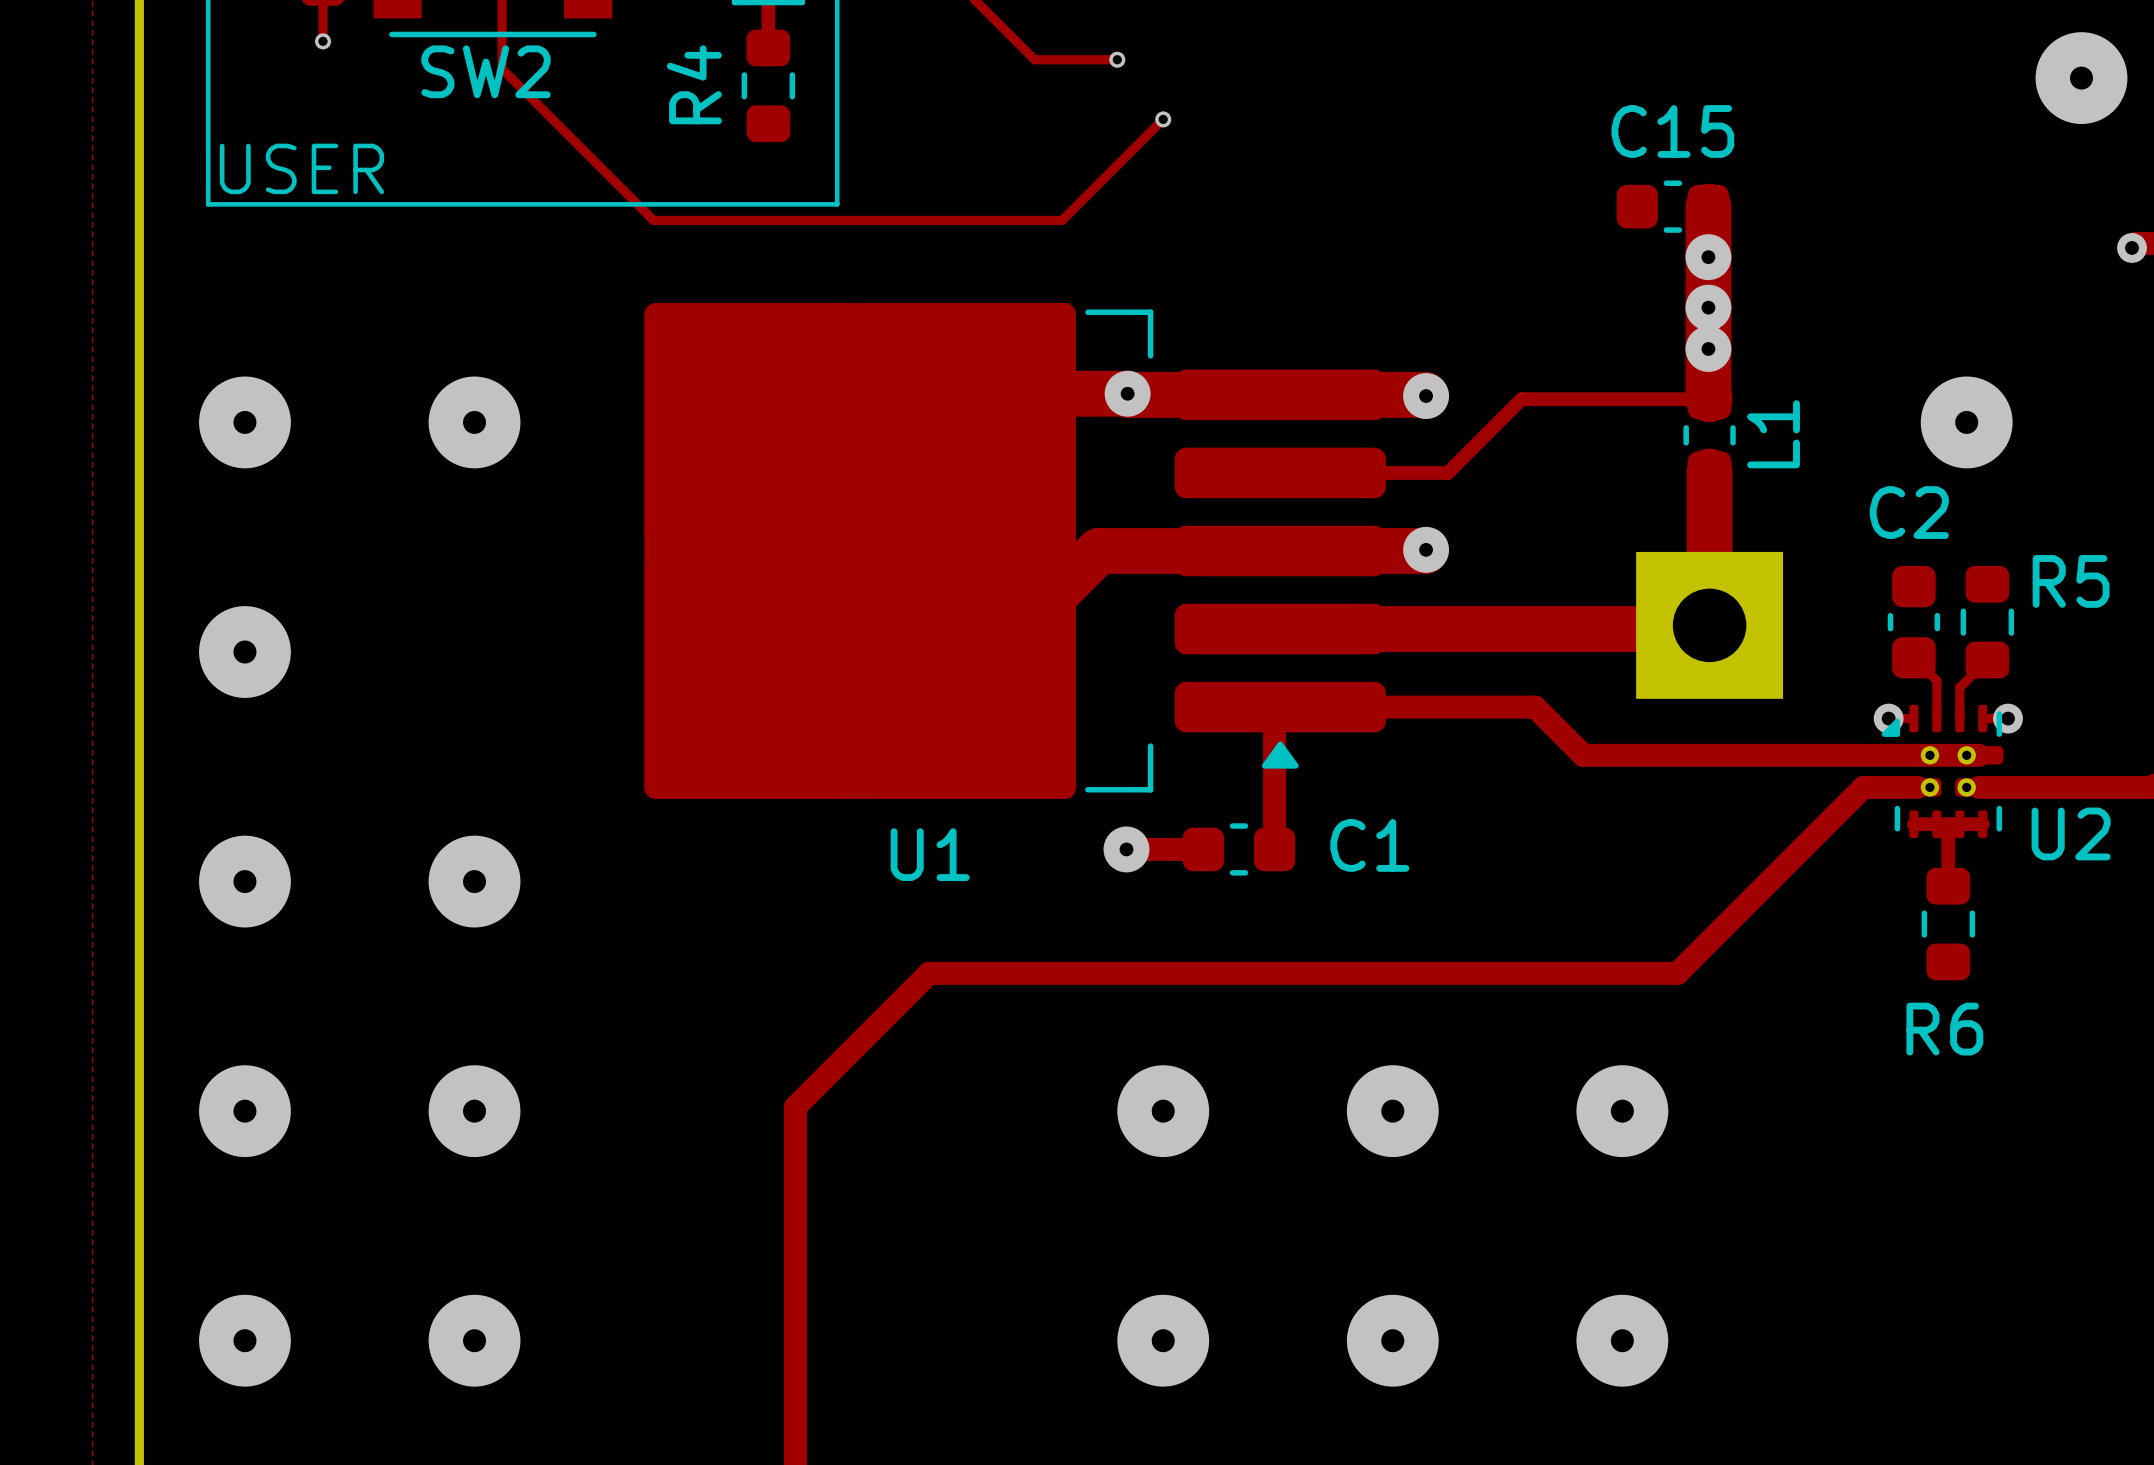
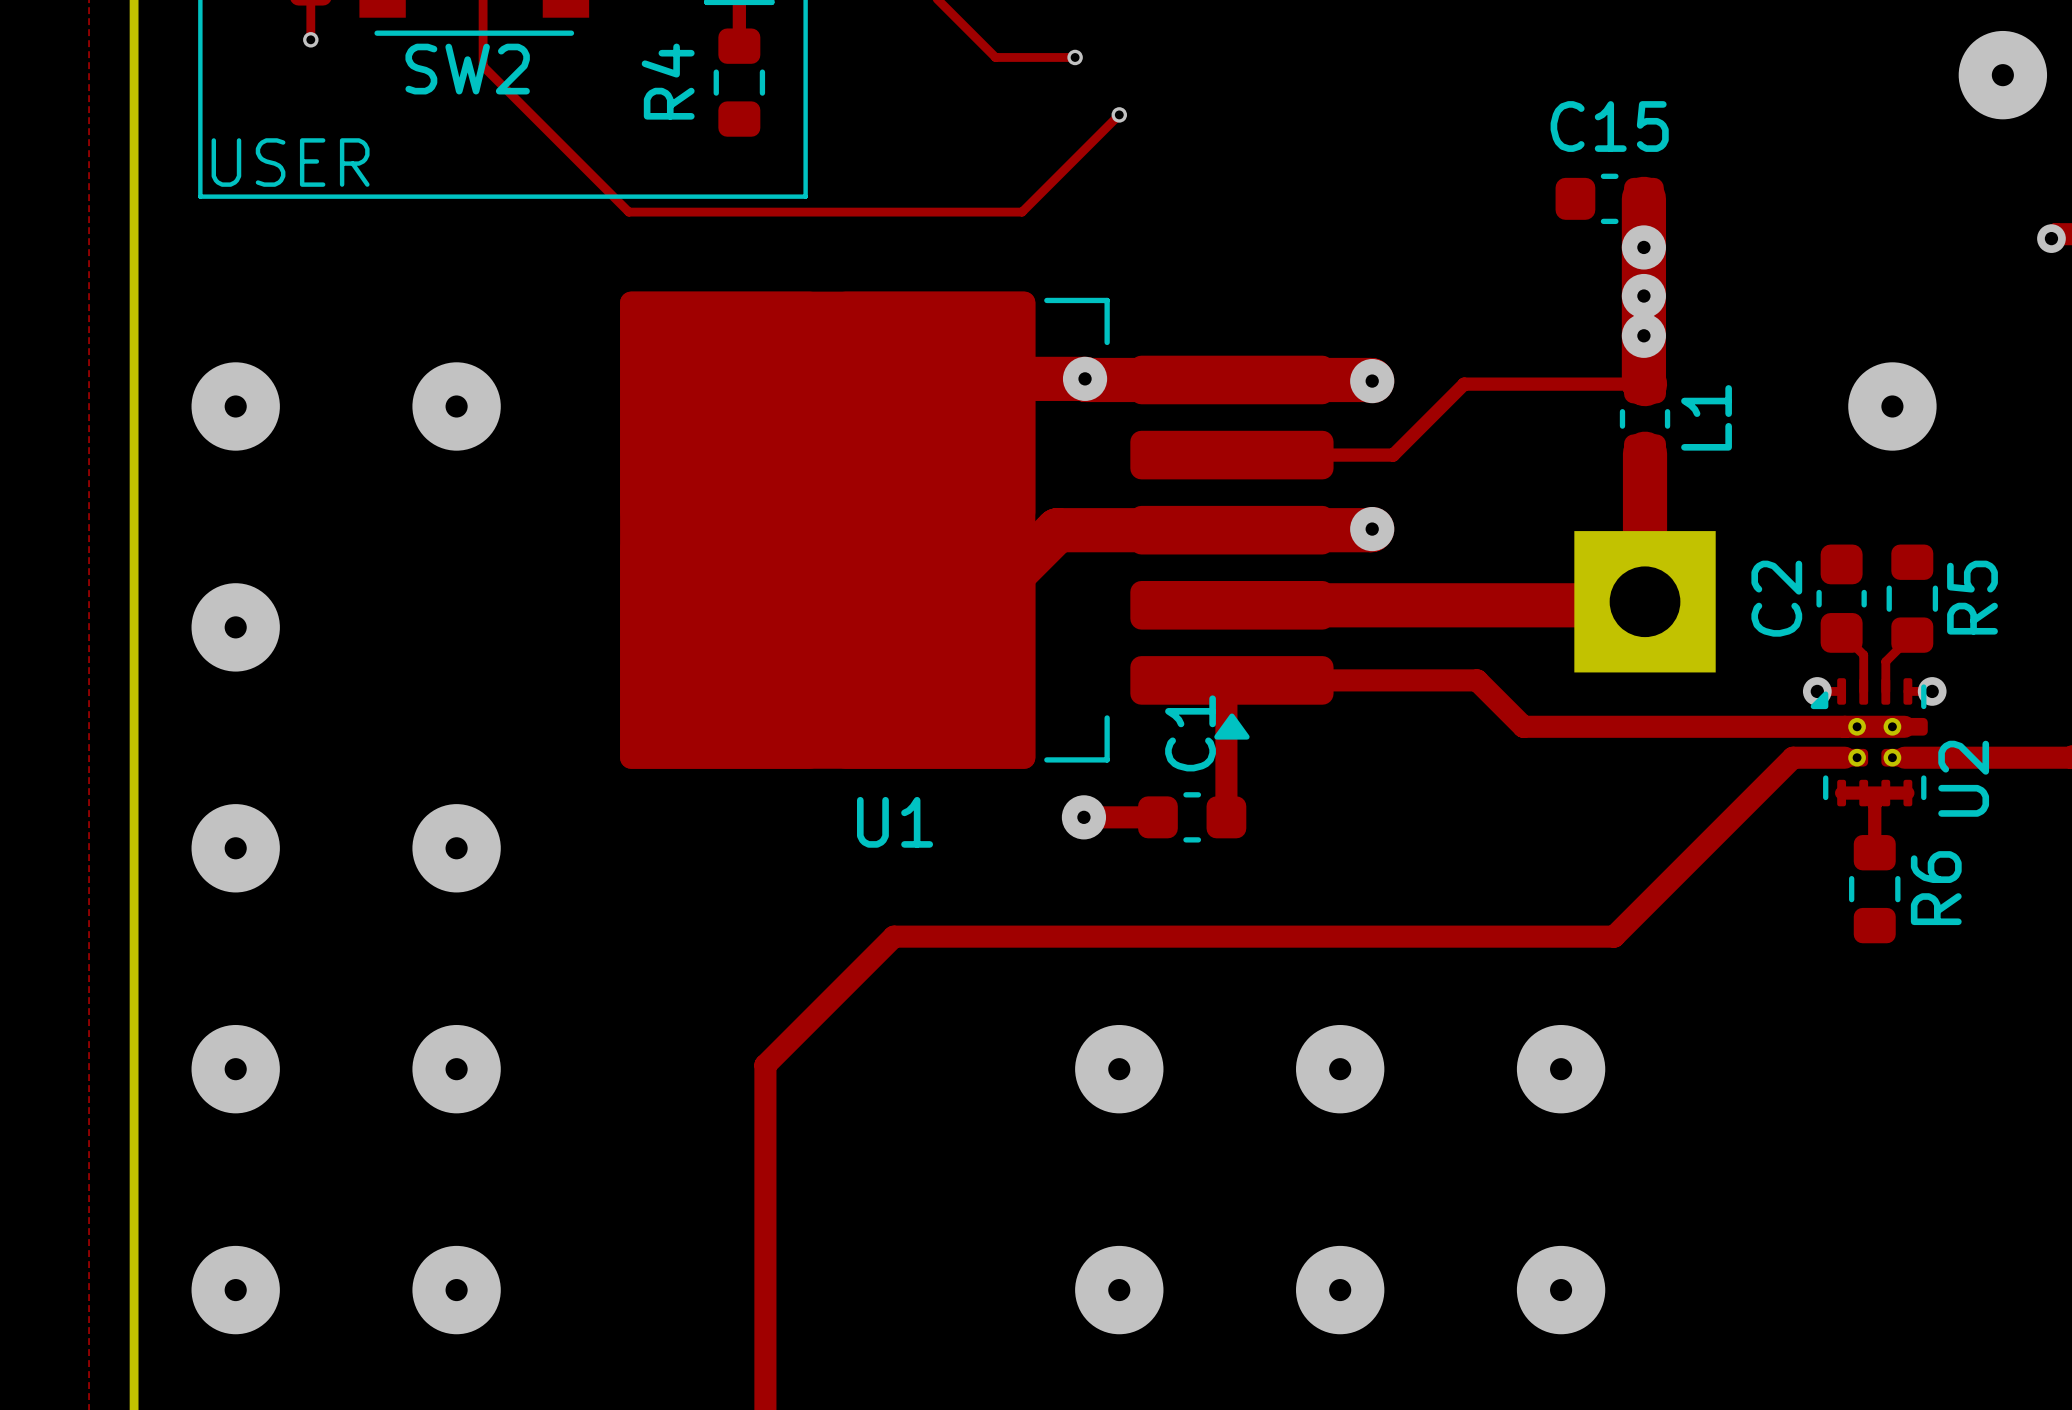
C2 name rotation: 0° (1909, 512) -> 90° counterclockwise (1776, 598)
C2 name position: C2 (1909, 512) -> C2 (1776, 598)
R5 name rotation: 0° (2071, 581) -> 90° counterclockwise (1972, 597)
U2 name rotation: 0° (2071, 833) -> 90° counterclockwise (1963, 778)
C1 name rotation: 0° (1369, 845) -> 90° counterclockwise (1190, 733)
C1 name position: C1 (1369, 845) -> C1 (1190, 733)
R6 name rotation: 0° (1944, 1029) -> 90° counterclockwise (1936, 888)
R6 name position: R6 (1944, 1029) -> R6 (1936, 888)

